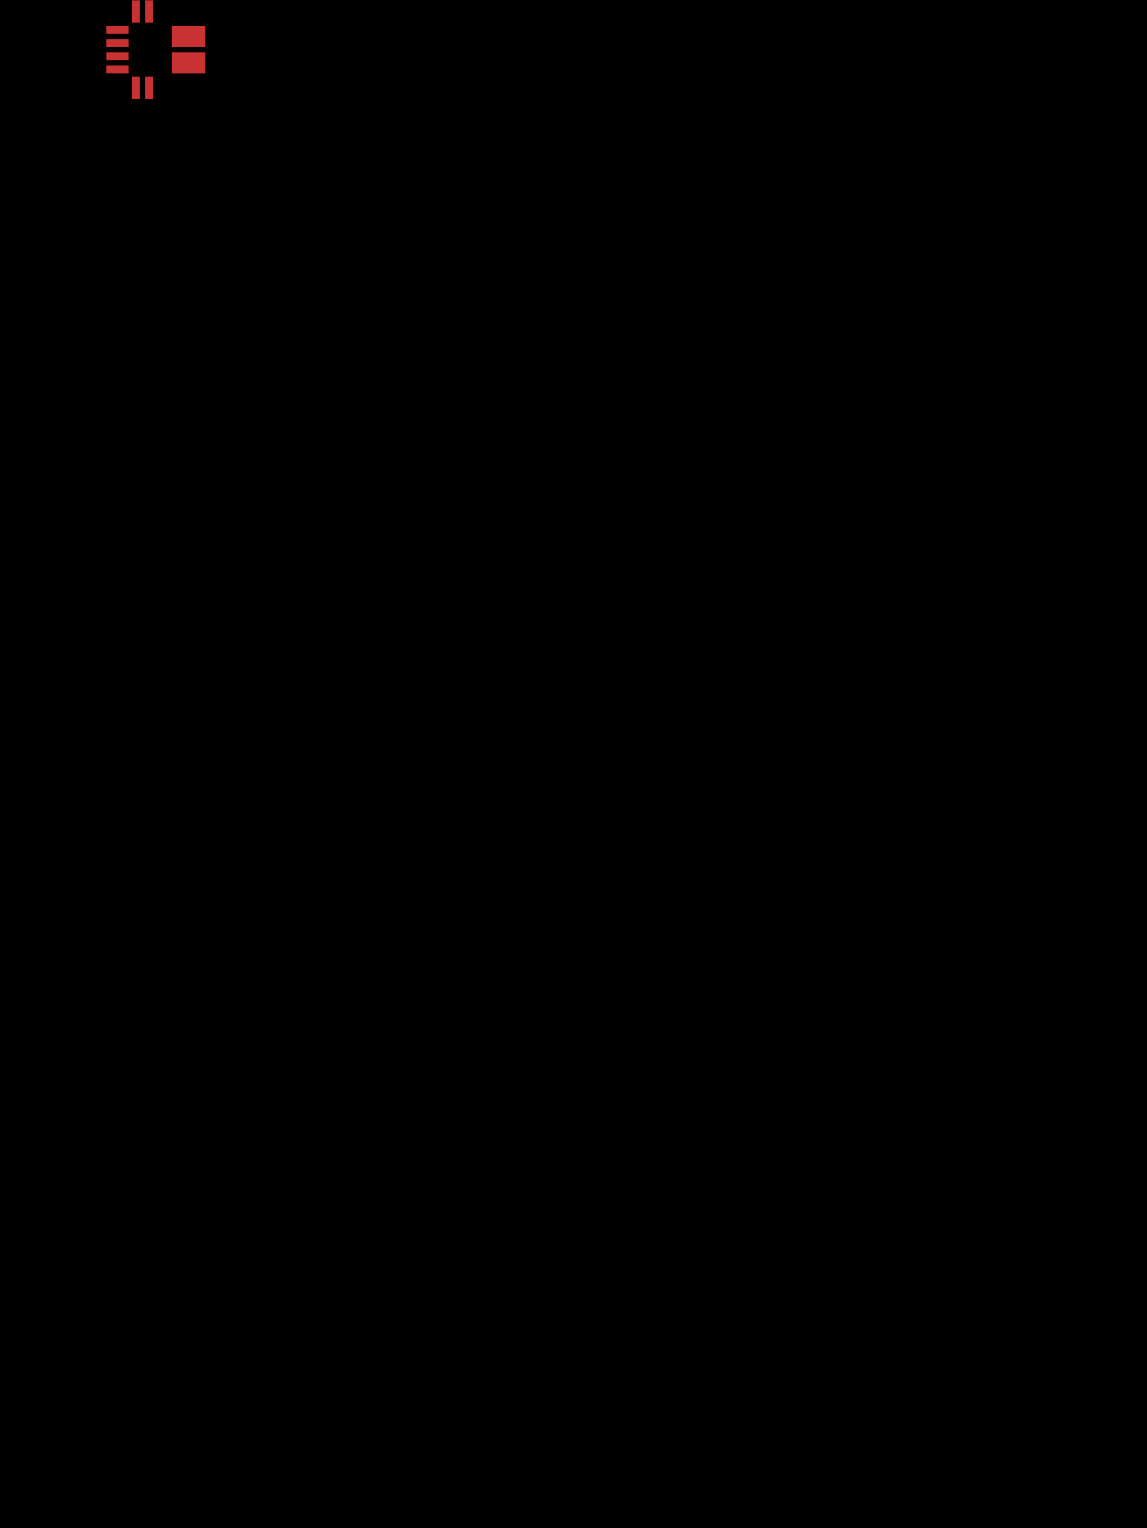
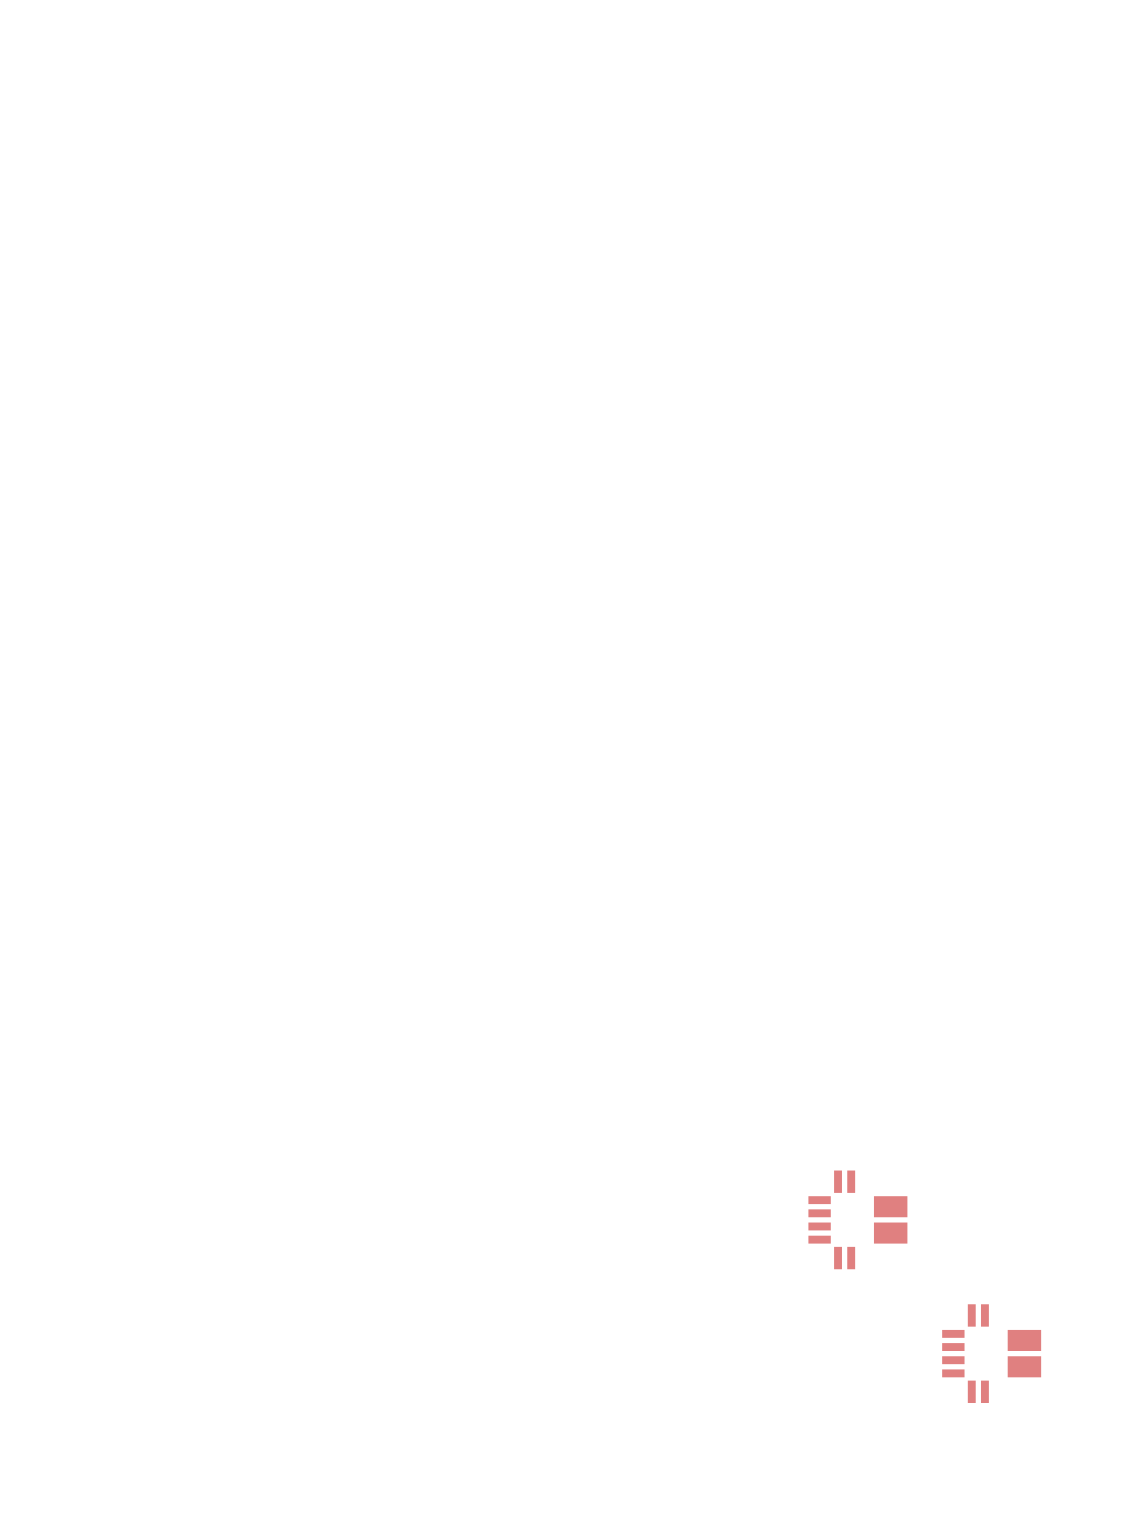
part: (155, 49) -> none
part: none -> (857, 1219)
part: none -> (991, 1353)

